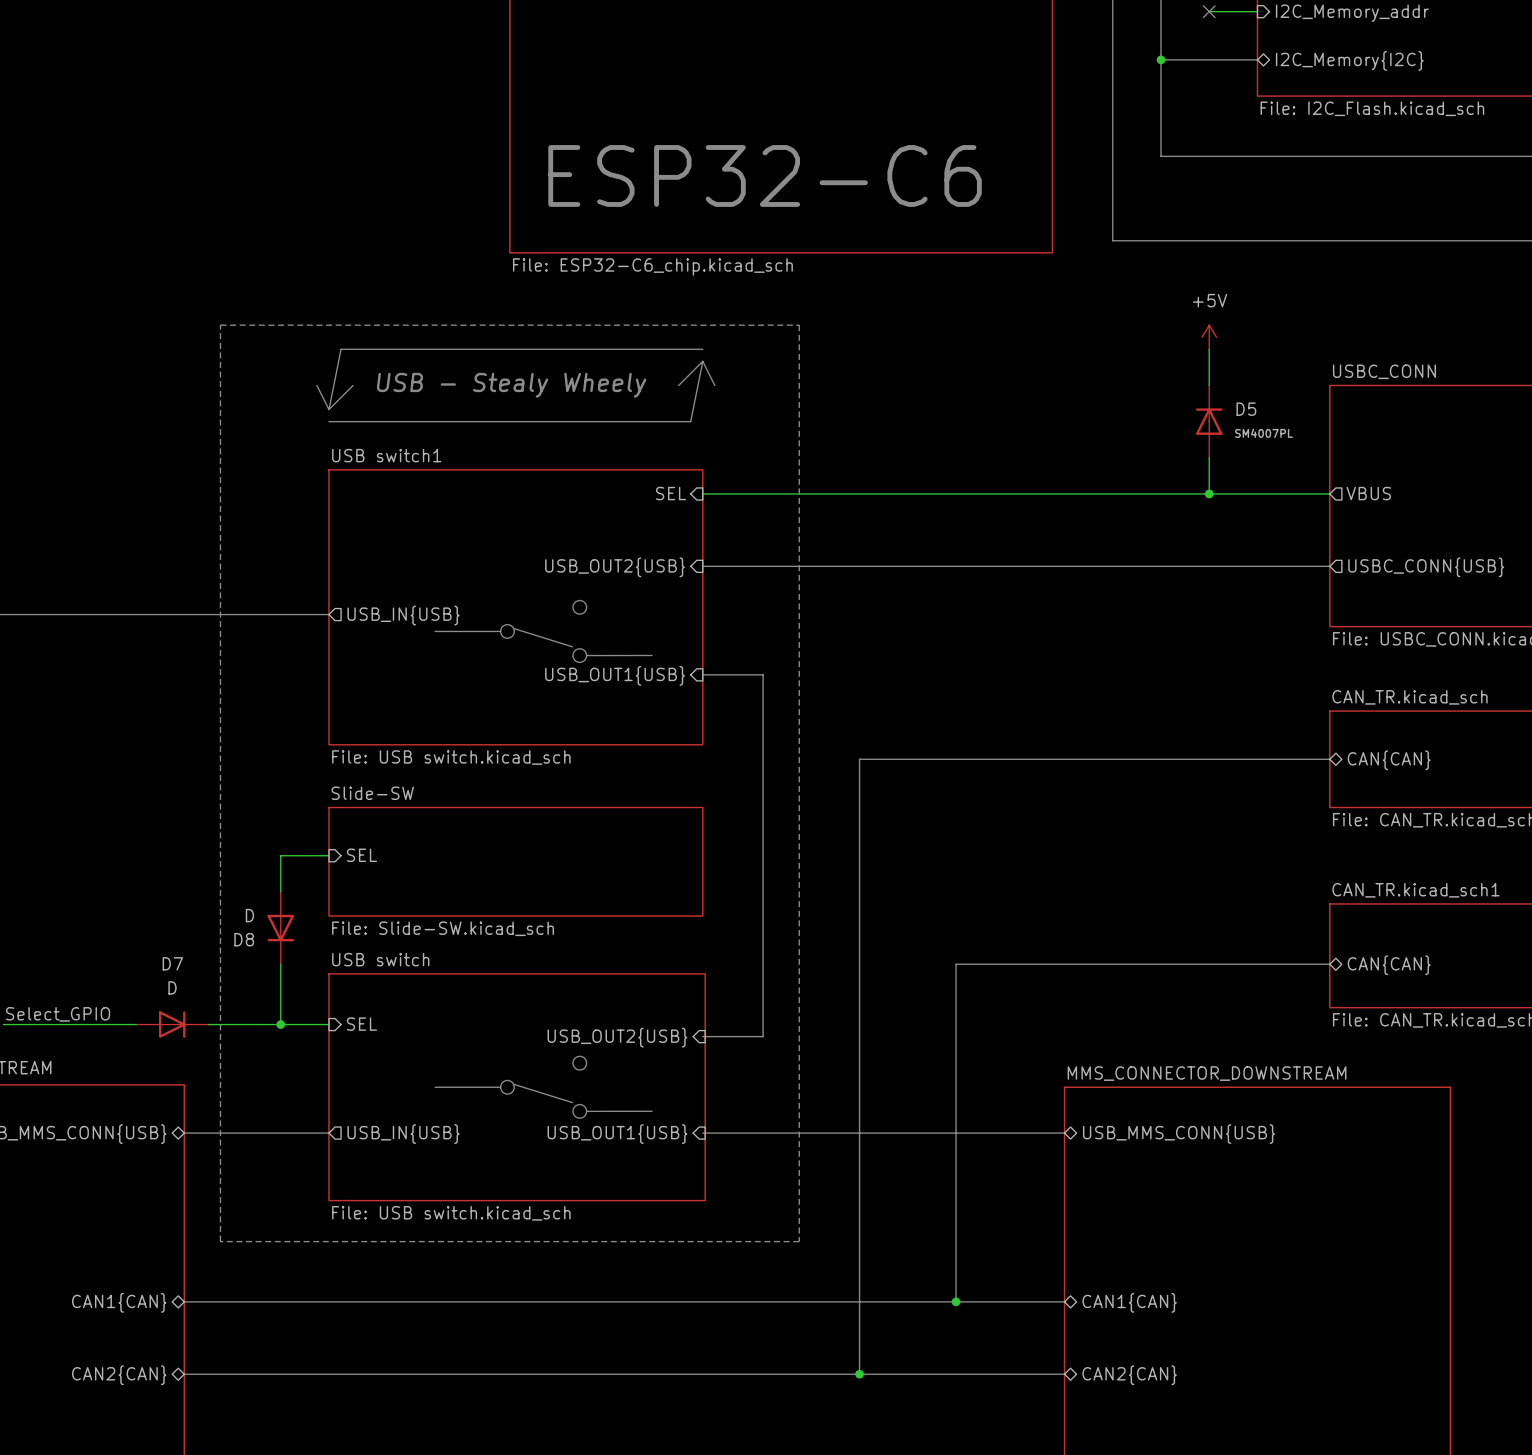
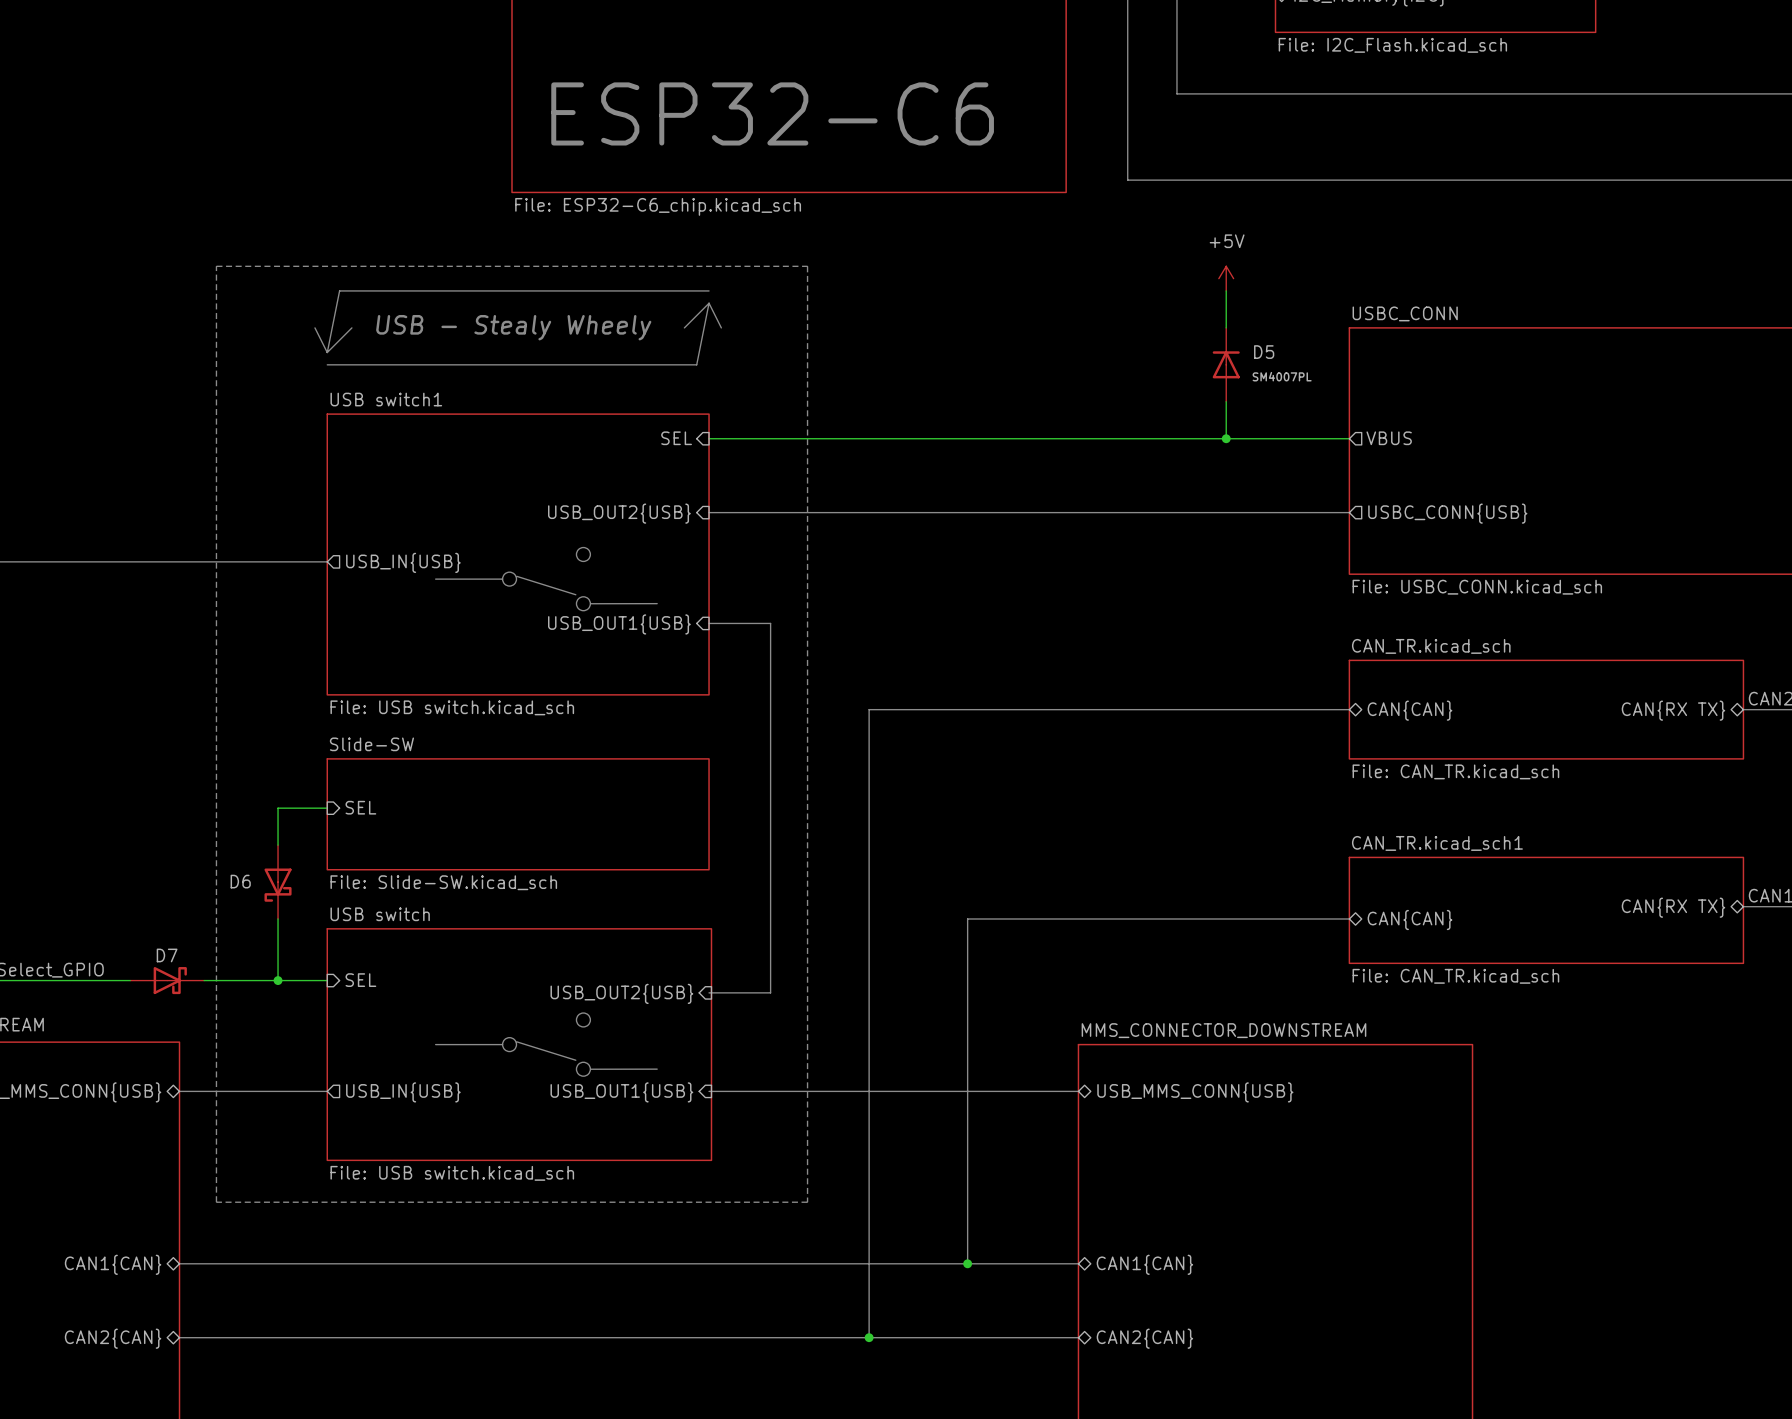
D8: D (280, 928) -> none
D6: none -> (278, 882)
D7 name position: D7 (172, 963) -> D7 (167, 955)
D7 value: D (172, 987) -> none
D7 symbol: [136, 1011, 209, 1038] -> [130, 967, 205, 995]

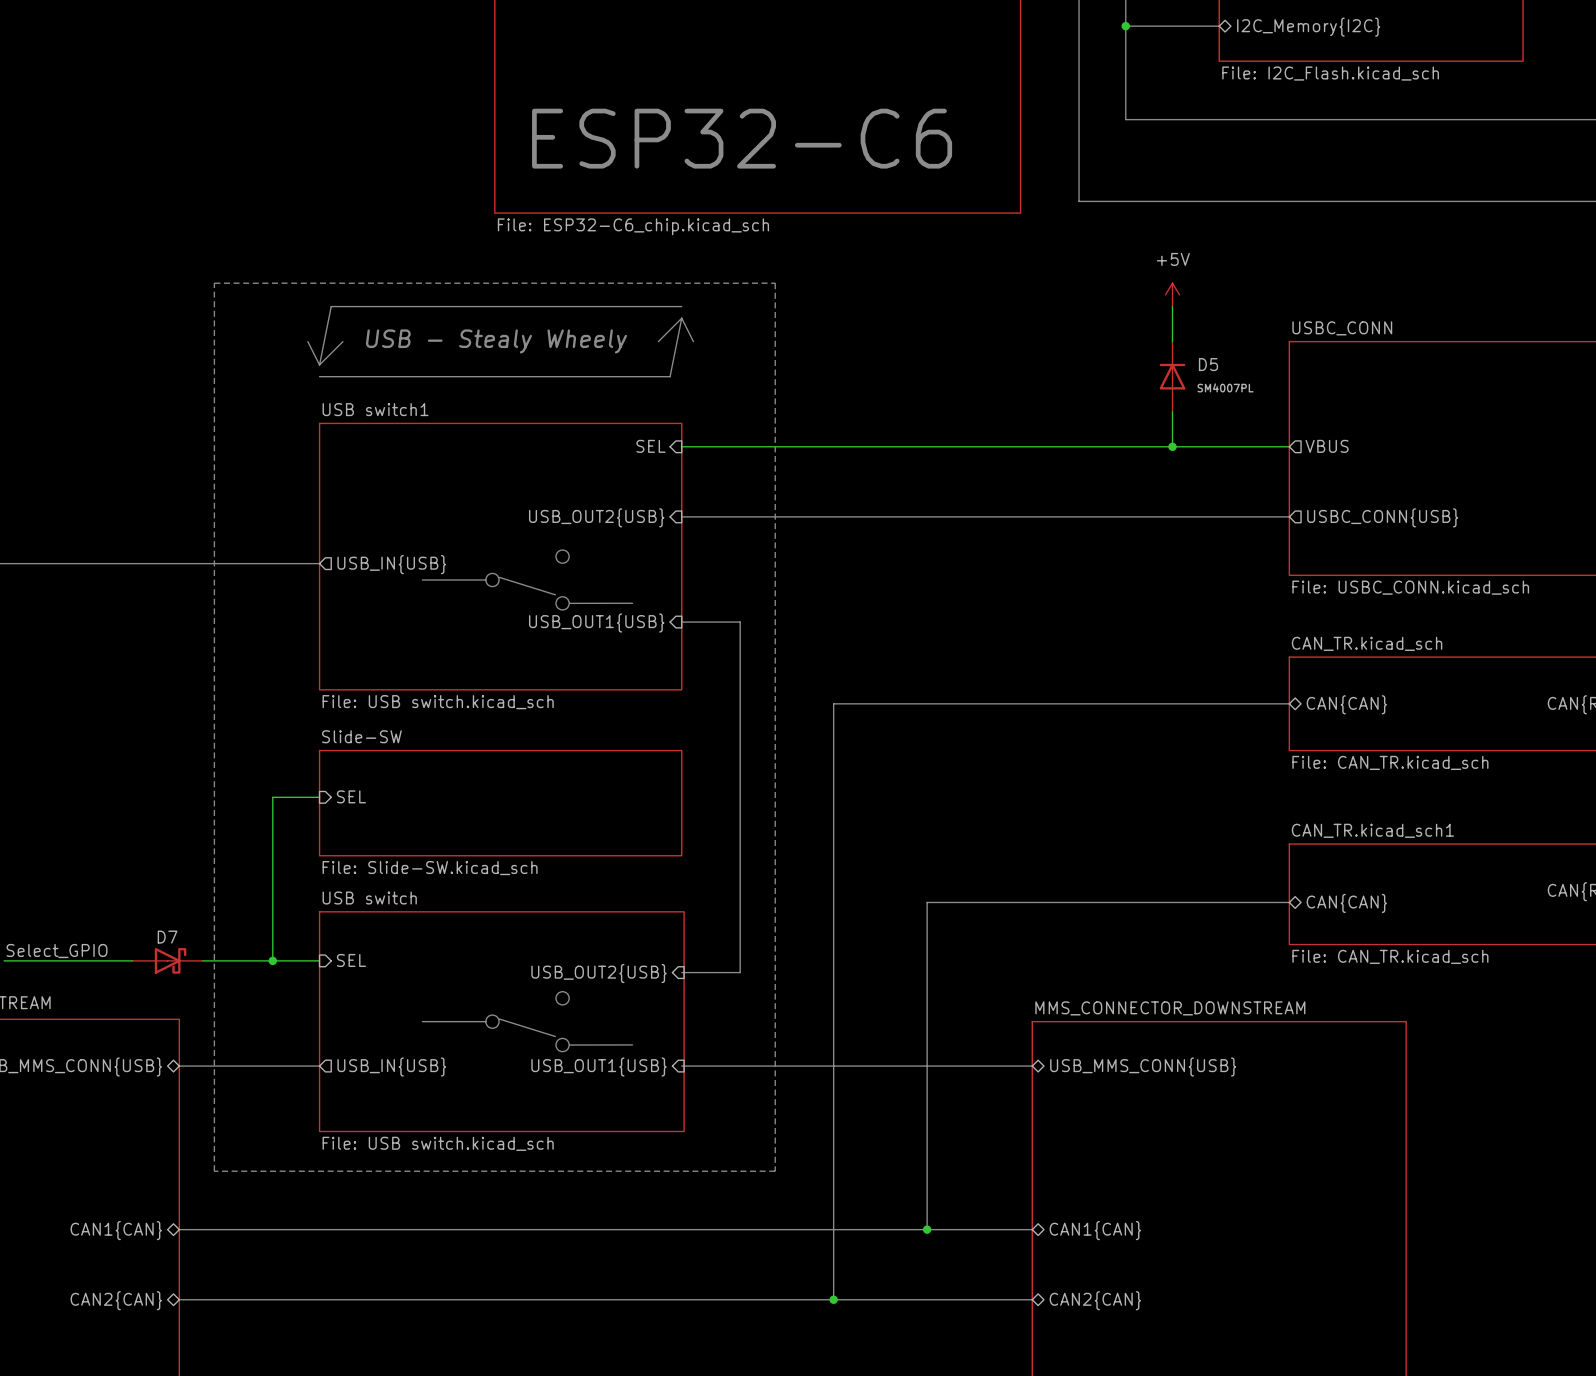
D6: (278, 882) -> none

